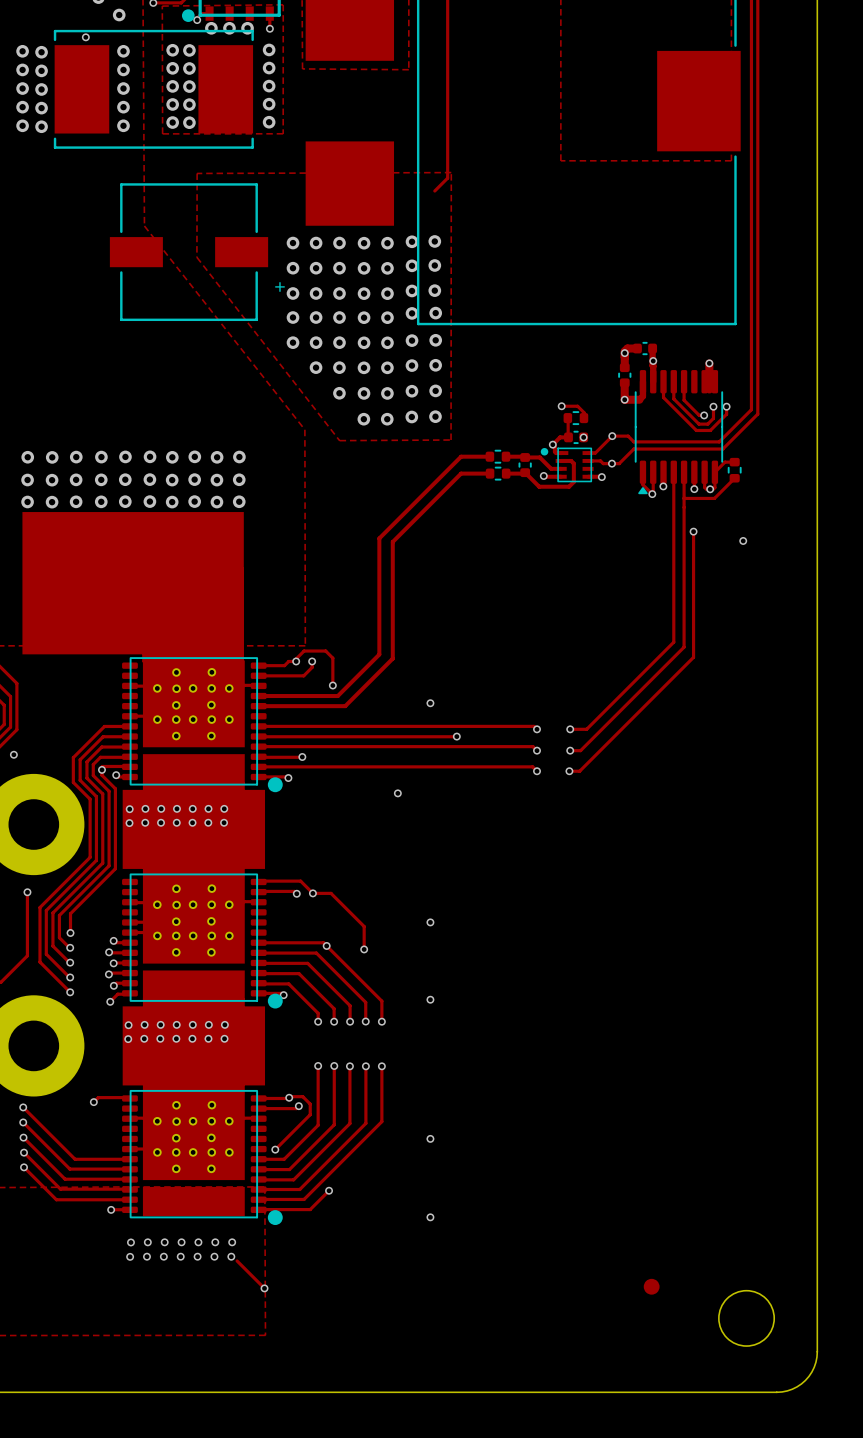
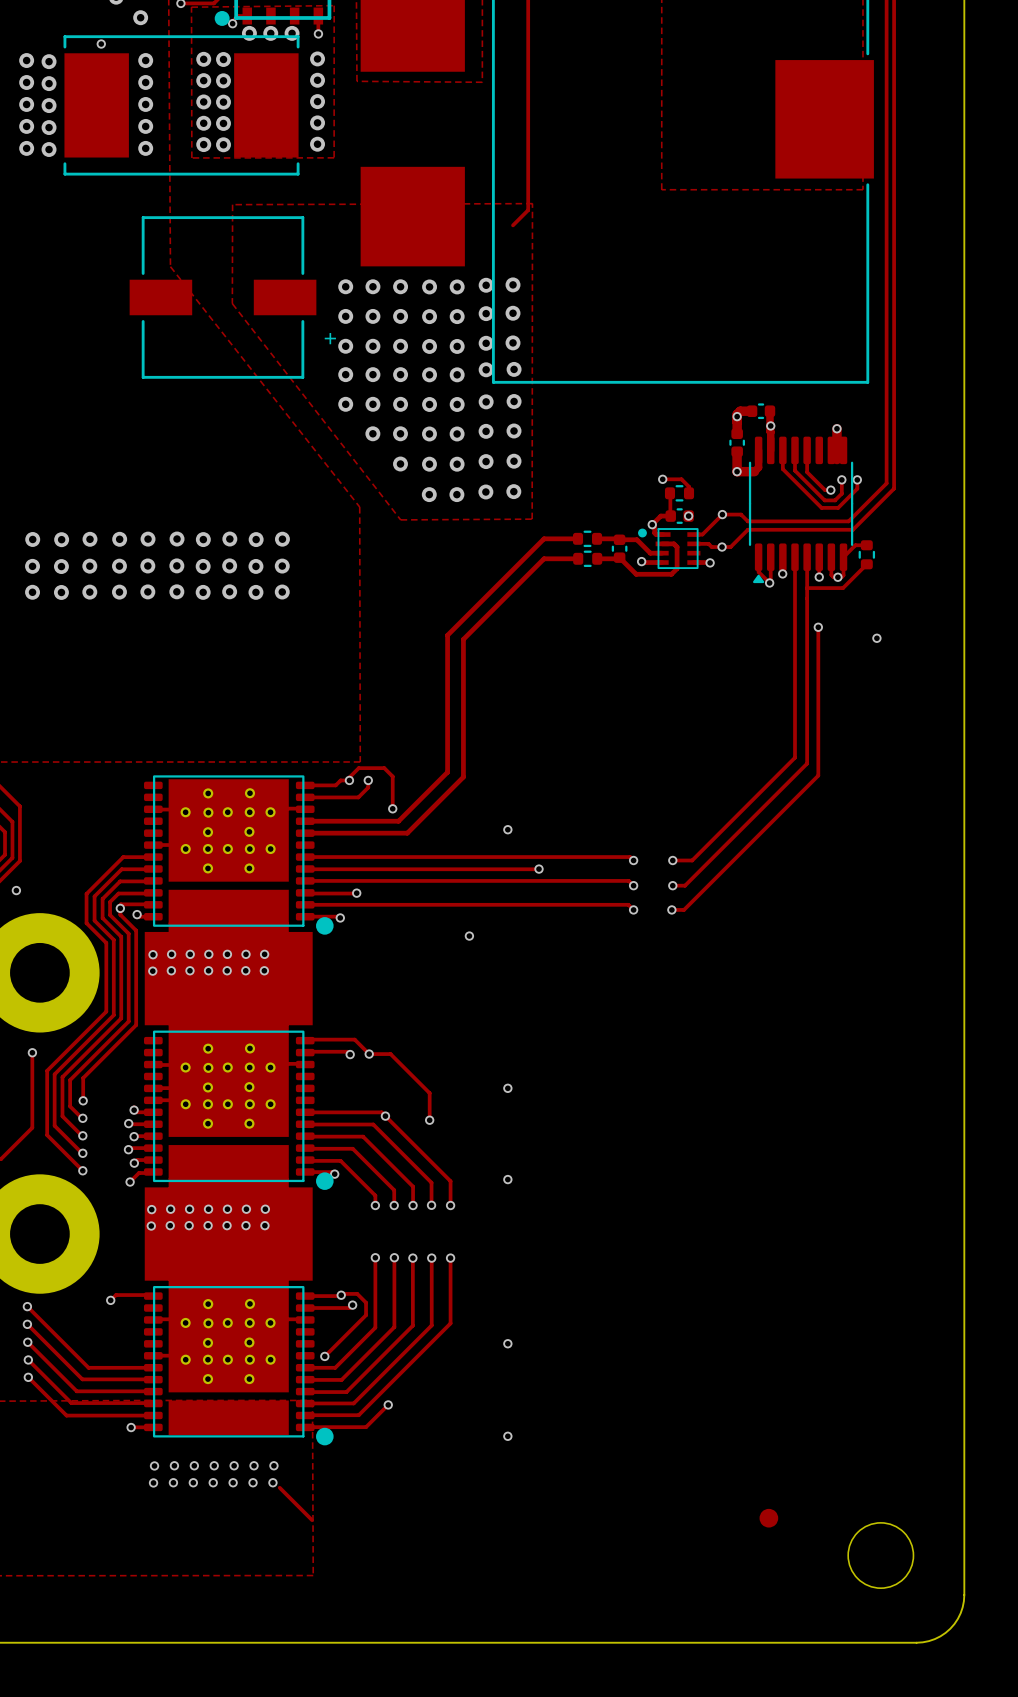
part: (133, 587) -> none
via: (264, 1288) -> none

